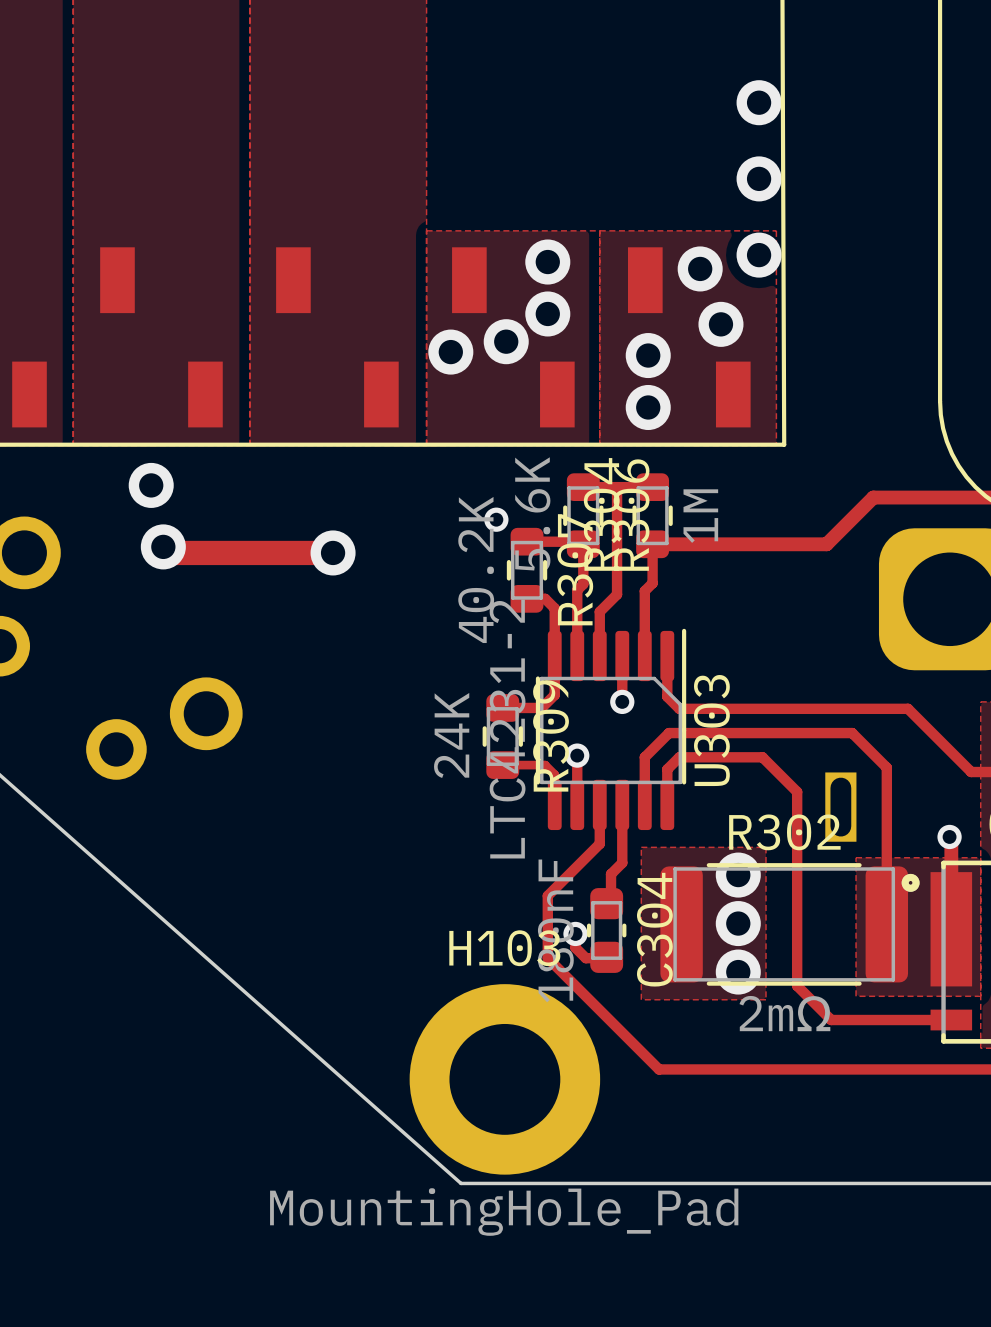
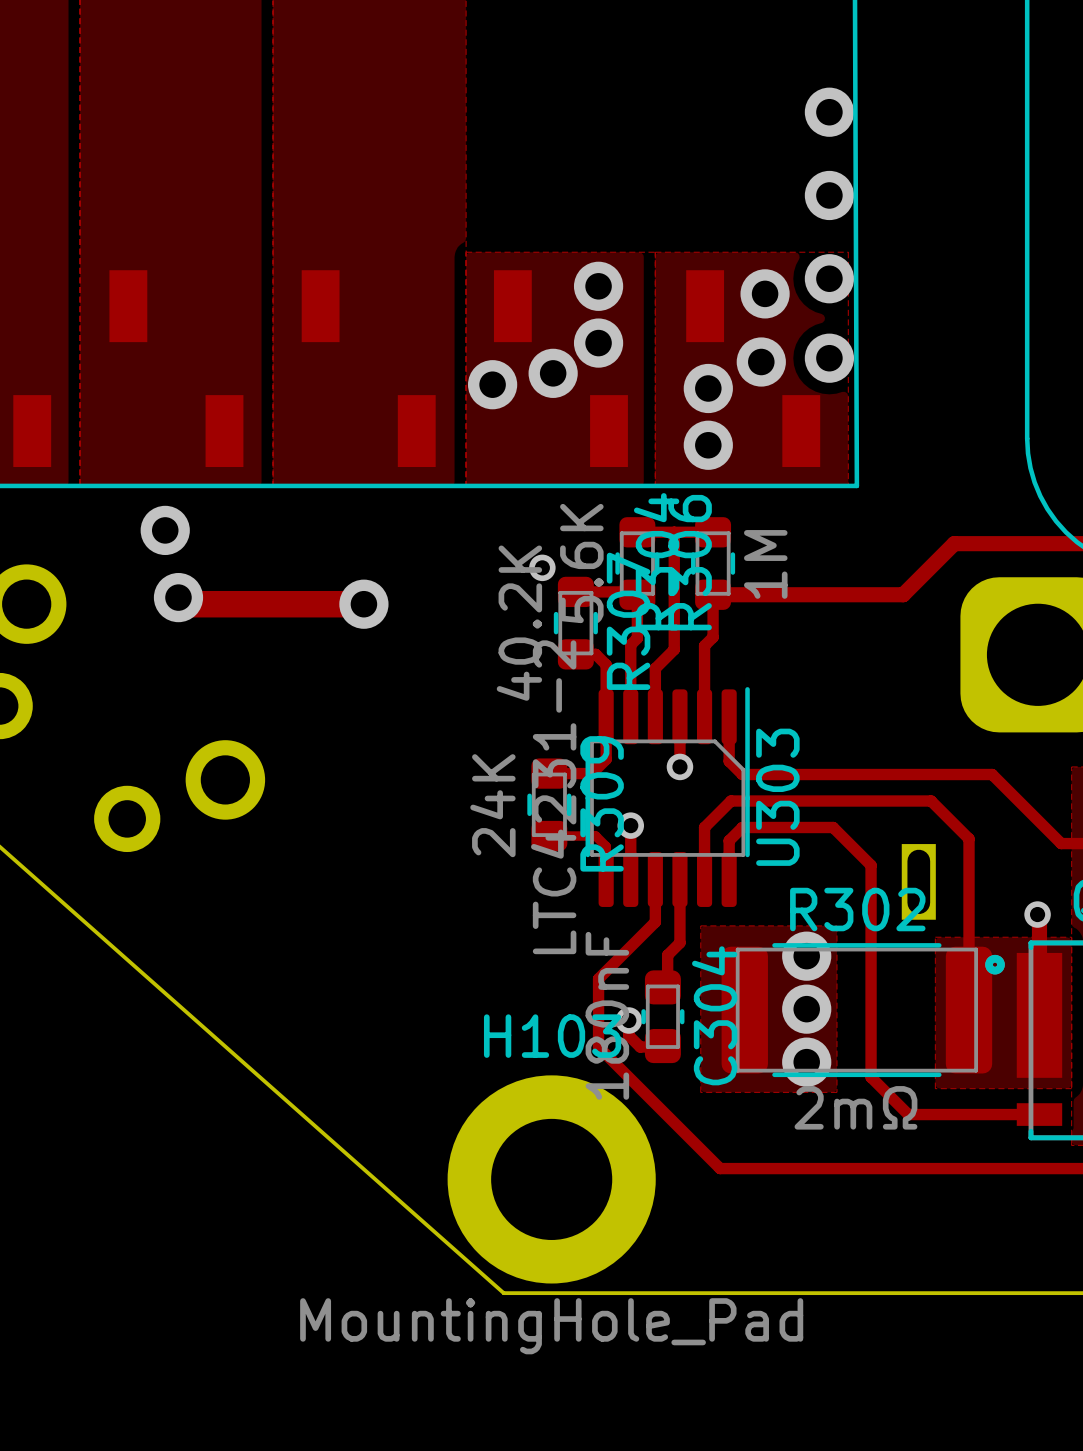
via: (720, 324) -> none
via: none -> (829, 358)
via: none -> (761, 362)

